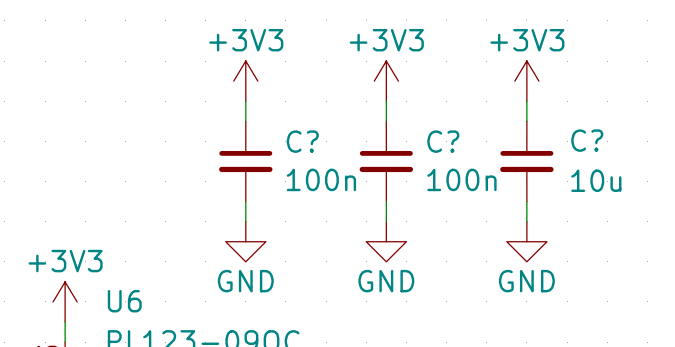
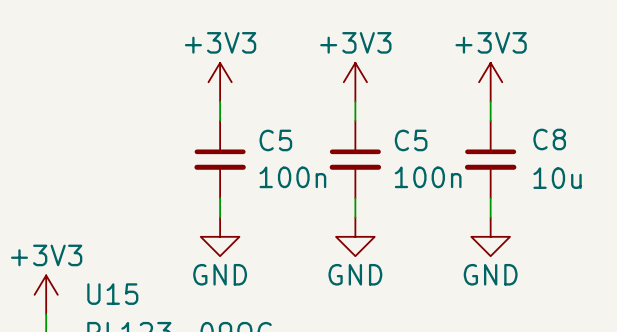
C? name: C? (587, 140) -> C8 (549, 139)
C? name: C? (302, 141) -> C5 (275, 140)
C? name: C? (443, 141) -> C5 (411, 140)
U6 name: U6 (124, 301) -> U15 (112, 294)

